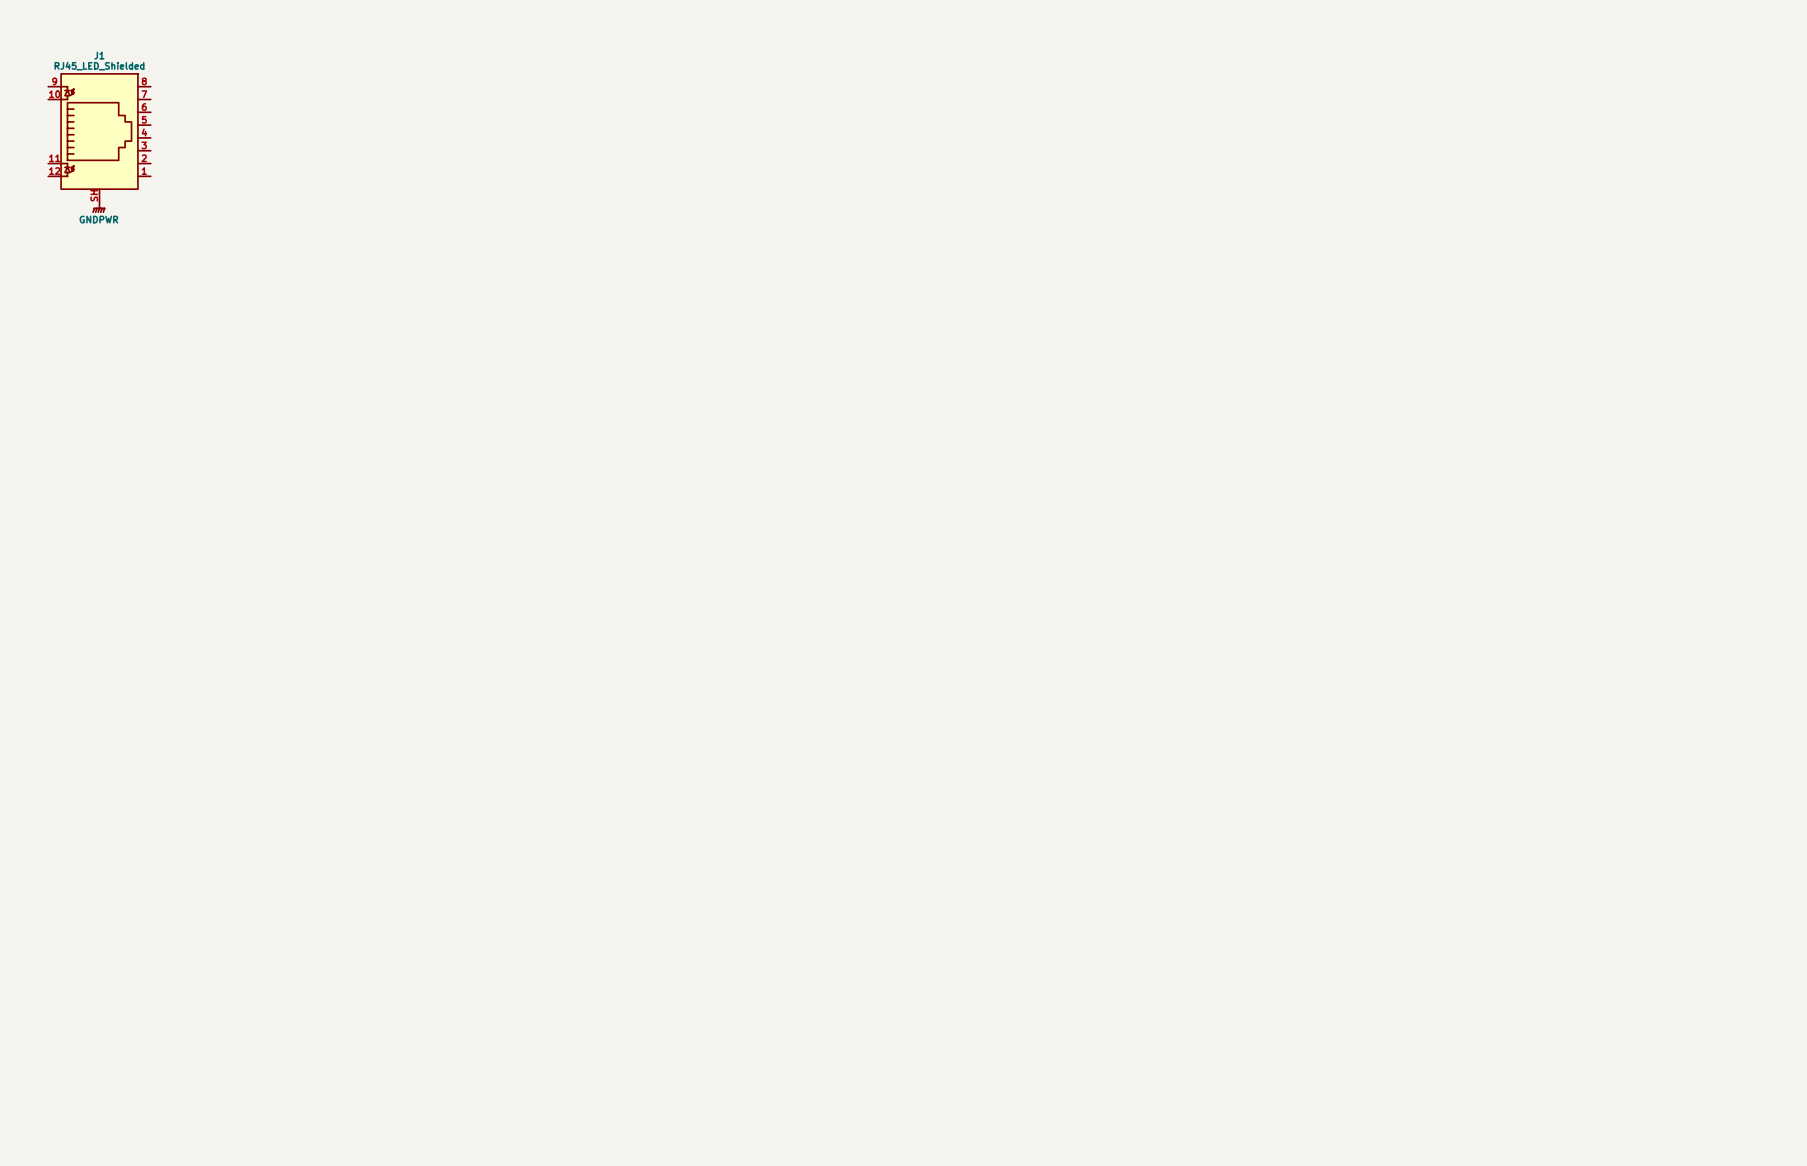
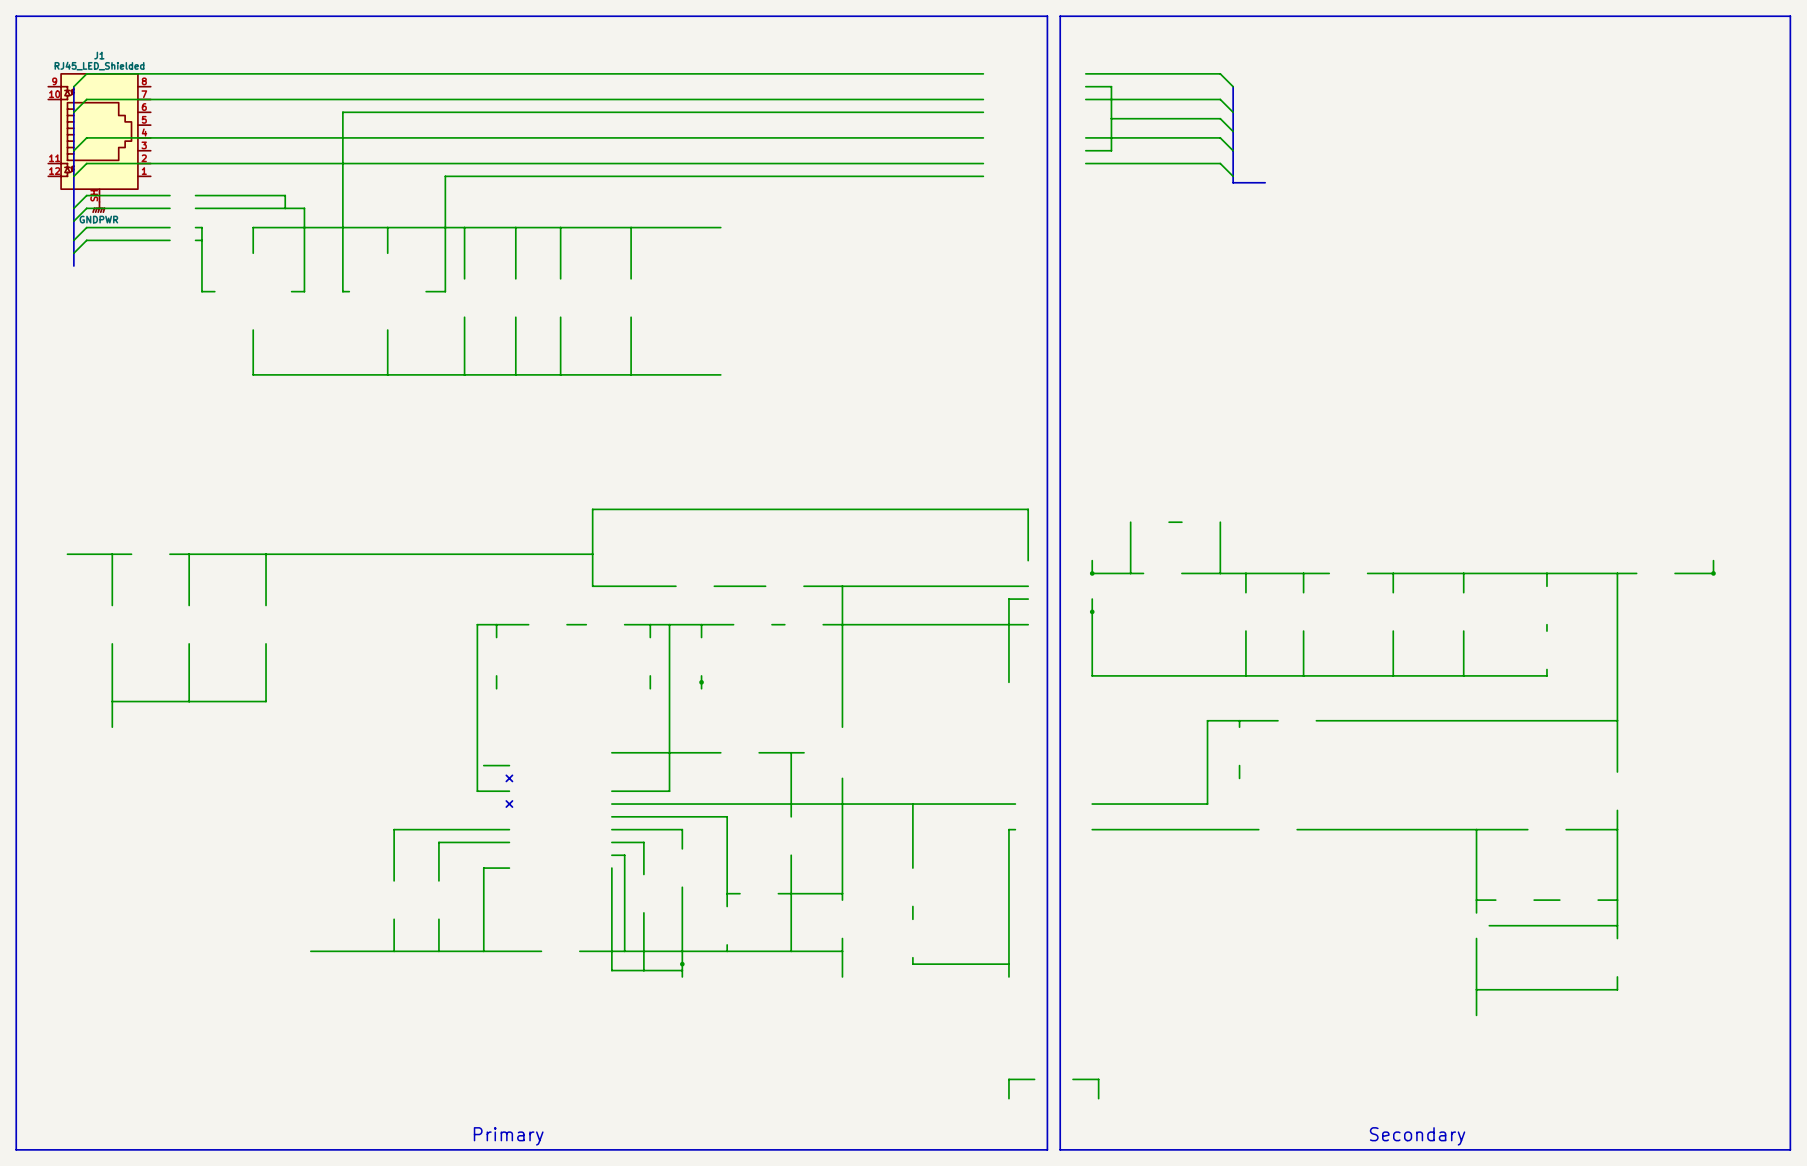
line: none -> (16, 16) (1047, 16) (1047, 1149) (16, 1149) (16, 16)
line: none -> (1060, 16) (1790, 16) (1790, 1149) (1060, 1149) (1060, 16)
wire: none -> (983, 73) (86, 73) (73, 86)
wire: none -> (1085, 73) (1220, 73) (1233, 86)
bus: none -> (73, 86) (73, 266)
wire: none -> (1085, 86) (1111, 86) (1111, 150) (1085, 150)
bus: none -> (1233, 86) (1233, 182) (1265, 182)
wire: none -> (983, 99) (86, 99) (73, 112)
wire: none -> (1085, 99) (1220, 99) (1233, 112)
wire: none -> (983, 112) (342, 112) (342, 291) (349, 291)
wire: none -> (1111, 118) (1220, 118) (1233, 131)
wire: none -> (983, 137) (86, 137) (73, 150)
wire: none -> (1085, 137) (1220, 137) (1233, 150)
wire: none -> (983, 163) (86, 163) (73, 176)
wire: none -> (1085, 163) (1220, 163) (1233, 176)
wire: none -> (983, 176) (445, 176) (445, 291) (426, 291)
wire: none -> (169, 195) (86, 195) (73, 208)
wire: none -> (195, 195) (285, 195) (285, 208)
wire: none -> (169, 208) (86, 208) (73, 221)
wire: none -> (195, 208) (304, 208) (304, 291) (291, 291)
wire: none -> (169, 227) (86, 227) (73, 240)
wire: none -> (195, 227) (201, 227) (201, 291) (214, 291)
wire: none -> (387, 227) (387, 253)
wire: none -> (464, 227) (464, 278)
wire: none -> (515, 227) (515, 278)
wire: none -> (560, 227) (560, 278)
wire: none -> (631, 227) (631, 278)
wire: none -> (720, 227) (253, 227) (253, 253)
wire: none -> (169, 240) (86, 240) (73, 253)
wire: none -> (195, 240) (201, 240)
wire: none -> (464, 317) (464, 374)
wire: none -> (515, 317) (515, 374)
wire: none -> (560, 317) (560, 374)
wire: none -> (631, 317) (631, 374)
wire: none -> (253, 330) (253, 374) (720, 374)
wire: none -> (387, 330) (387, 374)
wire: none -> (1130, 522) (1130, 573)
wire: none -> (1169, 522) (1181, 522)
wire: none -> (1220, 522) (1220, 573)
wire: none -> (67, 554) (131, 554)
wire: none -> (112, 554) (112, 605)
wire: none -> (169, 554) (592, 554)
wire: none -> (189, 554) (189, 605)
wire: none -> (266, 554) (266, 605)
wire: none -> (1028, 560) (1028, 509) (592, 509) (592, 586) (675, 586)
wire: none -> (1092, 560) (1092, 573) (1143, 573)
wire: none -> (1713, 560) (1713, 573) (1675, 573)
junction: none -> (1092, 573)
wire: none -> (1181, 573) (1329, 573)
wire: none -> (1245, 573) (1245, 592)
wire: none -> (1303, 573) (1303, 592)
wire: none -> (1367, 573) (1636, 573)
wire: none -> (1393, 573) (1393, 592)
wire: none -> (1463, 573) (1463, 592)
wire: none -> (1546, 573) (1546, 586)
wire: none -> (1617, 573) (1617, 771)
junction: none -> (1713, 573)
wire: none -> (714, 586) (765, 586)
wire: none -> (804, 586) (1028, 586)
wire: none -> (842, 586) (842, 727)
wire: none -> (1028, 599) (1008, 599) (1008, 682)
wire: none -> (1092, 599) (1092, 675) (1546, 675) (1546, 669)
junction: none -> (1092, 611)
wire: none -> (496, 624) (496, 637)
wire: none -> (528, 624) (477, 624) (477, 791) (509, 791)
wire: none -> (567, 624) (586, 624)
wire: none -> (624, 624) (733, 624)
wire: none -> (650, 624) (650, 637)
wire: none -> (669, 624) (669, 791) (611, 791)
wire: none -> (701, 624) (701, 637)
wire: none -> (771, 624) (784, 624)
wire: none -> (823, 624) (1028, 624)
wire: none -> (1546, 624) (1546, 631)
wire: none -> (1245, 631) (1245, 675)
wire: none -> (1303, 631) (1303, 675)
wire: none -> (1393, 631) (1393, 675)
wire: none -> (1463, 631) (1463, 675)
wire: none -> (112, 643) (112, 727)
wire: none -> (189, 643) (189, 701)
wire: none -> (266, 643) (266, 701) (112, 701)
wire: none -> (496, 675) (496, 688)
wire: none -> (650, 675) (650, 688)
wire: none -> (701, 675) (701, 688)
junction: none -> (701, 682)
wire: none -> (1239, 720) (1239, 727)
wire: none -> (1277, 720) (1207, 720) (1207, 804) (1092, 804)
wire: none -> (1316, 720) (1617, 720)
wire: none -> (611, 752) (720, 752)
wire: none -> (759, 752) (804, 752)
wire: none -> (791, 752) (791, 816)
wire: none -> (483, 765) (509, 765)
wire: none -> (1239, 765) (1239, 778)
no-connect mark: none -> (509, 778)
wire: none -> (842, 778) (842, 900)
no-connect mark: none -> (509, 804)
wire: none -> (611, 804) (1015, 804)
wire: none -> (912, 804) (912, 868)
wire: none -> (1617, 810) (1617, 938)
wire: none -> (611, 816) (727, 816) (727, 906)
wire: none -> (509, 829) (394, 829) (394, 880)
wire: none -> (611, 829) (682, 829) (682, 848)
wire: none -> (1015, 829) (1008, 829) (1008, 976)
wire: none -> (1092, 829) (1258, 829)
wire: none -> (1297, 829) (1527, 829)
wire: none -> (1476, 829) (1476, 912)
wire: none -> (1566, 829) (1617, 829)
wire: none -> (509, 842) (438, 842) (438, 880)
wire: none -> (611, 842) (643, 842) (643, 874)
wire: none -> (611, 855) (624, 855) (624, 951)
wire: none -> (791, 855) (791, 951)
wire: none -> (509, 868) (483, 868) (483, 951)
wire: none -> (611, 868) (611, 970) (682, 970)
wire: none -> (682, 887) (682, 976)
wire: none -> (727, 893) (739, 893)
wire: none -> (778, 893) (842, 893)
wire: none -> (1476, 900) (1495, 900)
wire: none -> (1534, 900) (1559, 900)
wire: none -> (1598, 900) (1617, 900)
wire: none -> (912, 906) (912, 919)
wire: none -> (643, 912) (643, 970)
wire: none -> (394, 919) (394, 951)
wire: none -> (438, 919) (438, 951)
wire: none -> (1489, 925) (1617, 925)
wire: none -> (842, 938) (842, 976)
wire: none -> (1476, 938) (1476, 1015)
wire: none -> (727, 944) (727, 951)
wire: none -> (310, 951) (541, 951)
wire: none -> (579, 951) (842, 951)
wire: none -> (912, 957) (912, 964) (1008, 964)
junction: none -> (682, 964)
wire: none -> (1617, 976) (1617, 989) (1476, 989)
wire: none -> (1034, 1079) (1008, 1079) (1008, 1098)
wire: none -> (1073, 1079) (1098, 1079) (1098, 1098)
text: none -> Primary (508, 1136)
text: none -> Secondary (1417, 1136)

